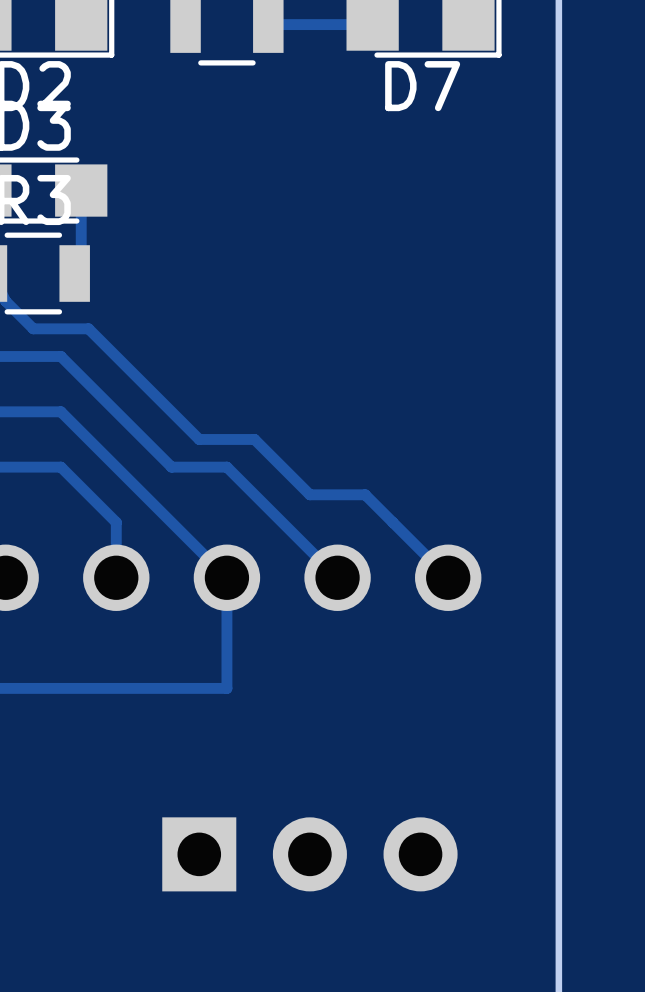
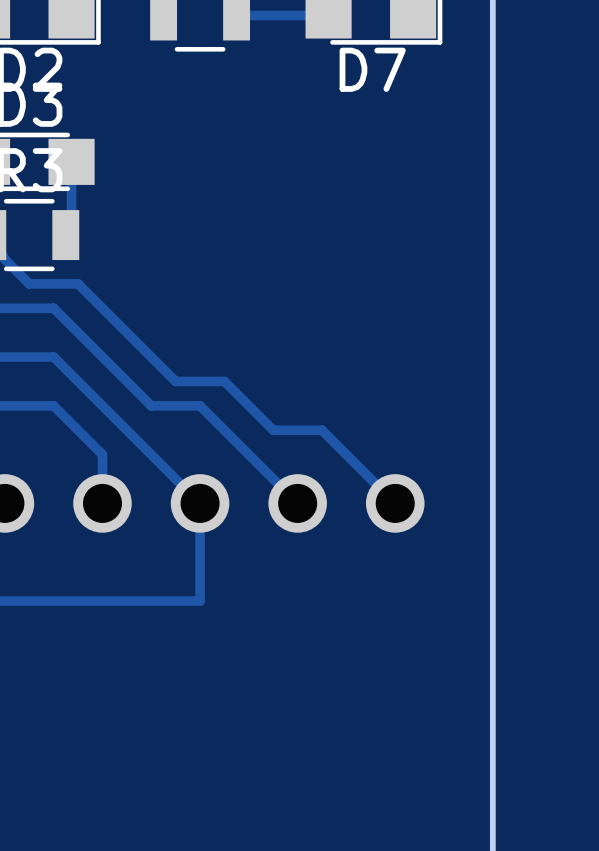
part: (309, 854) -> none

